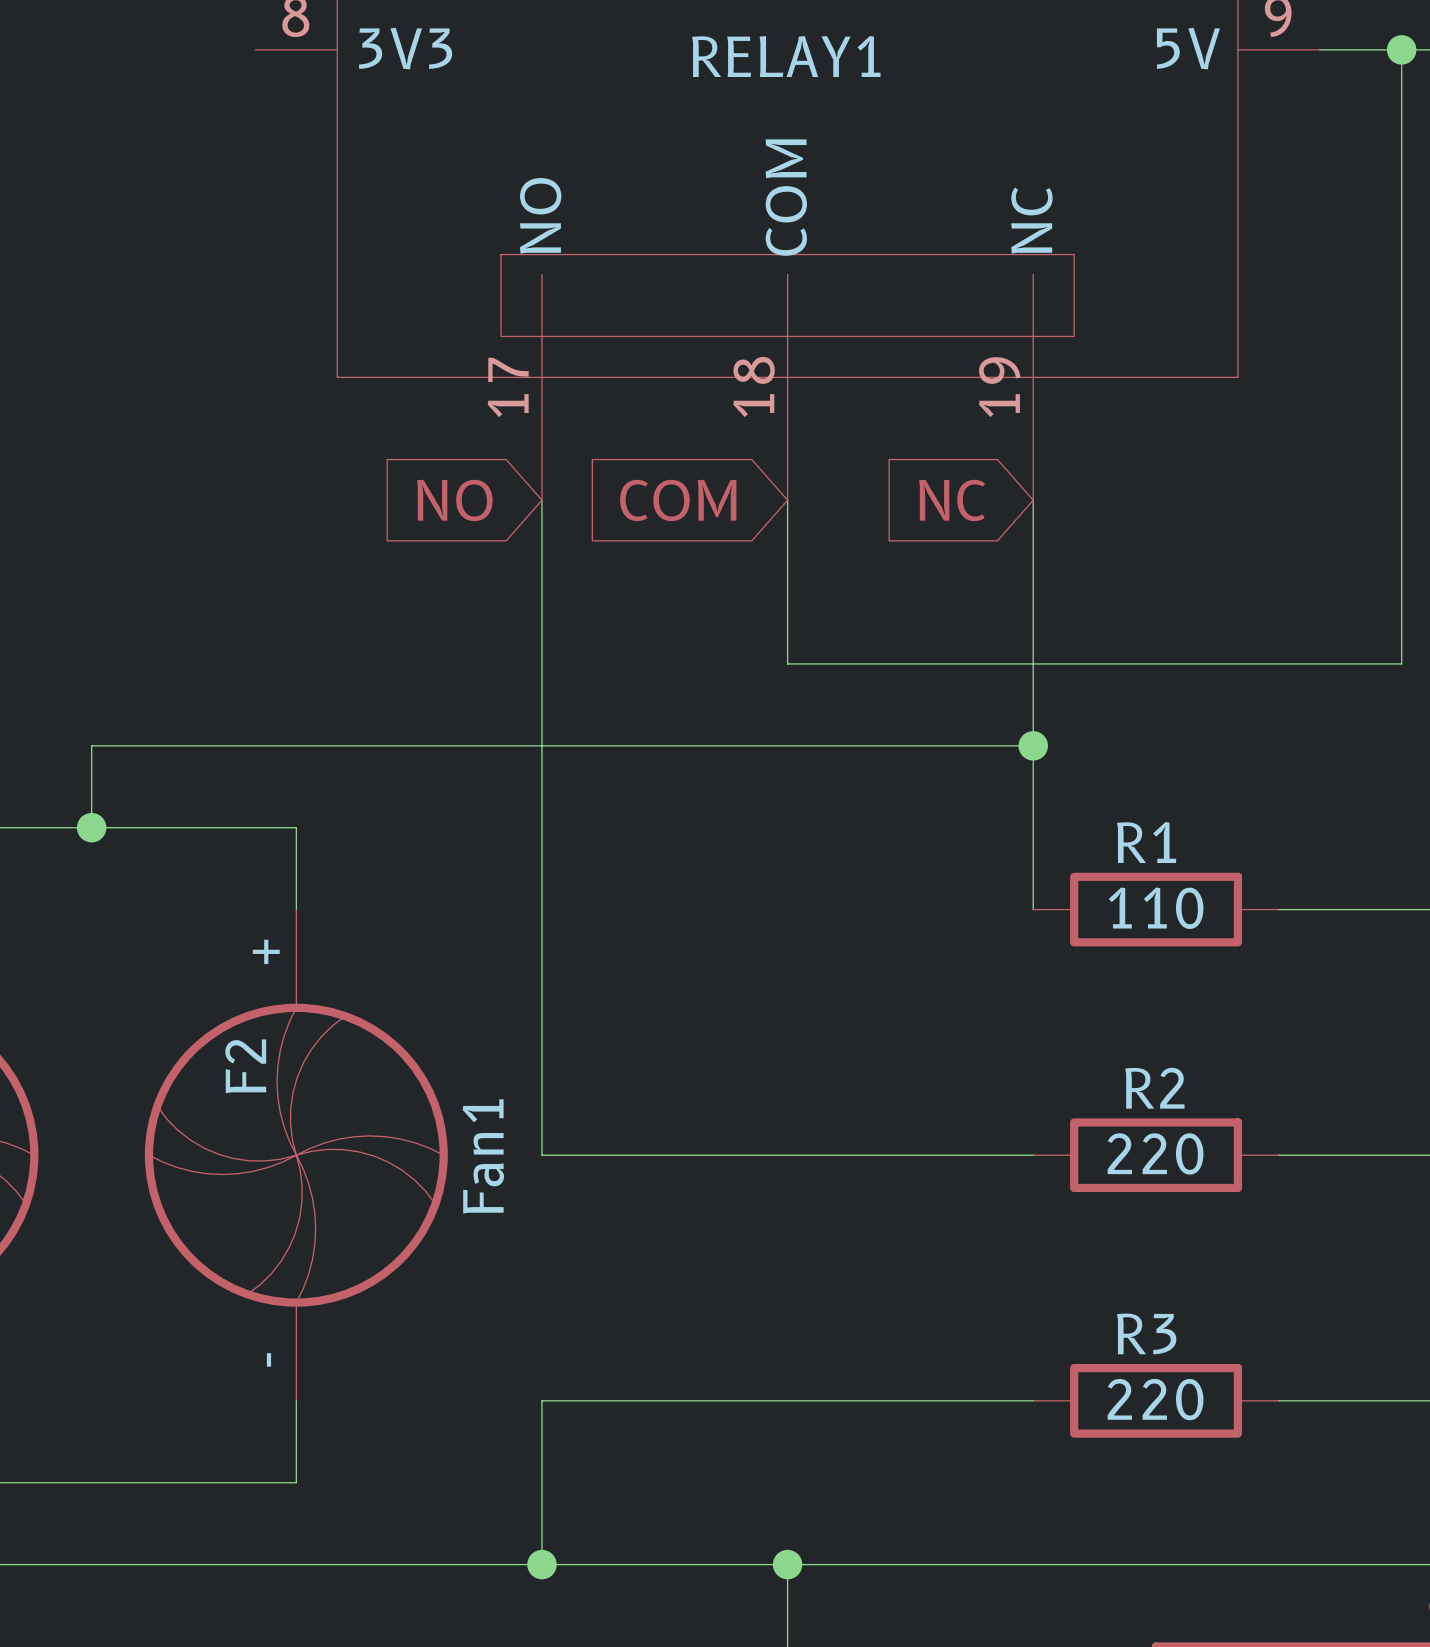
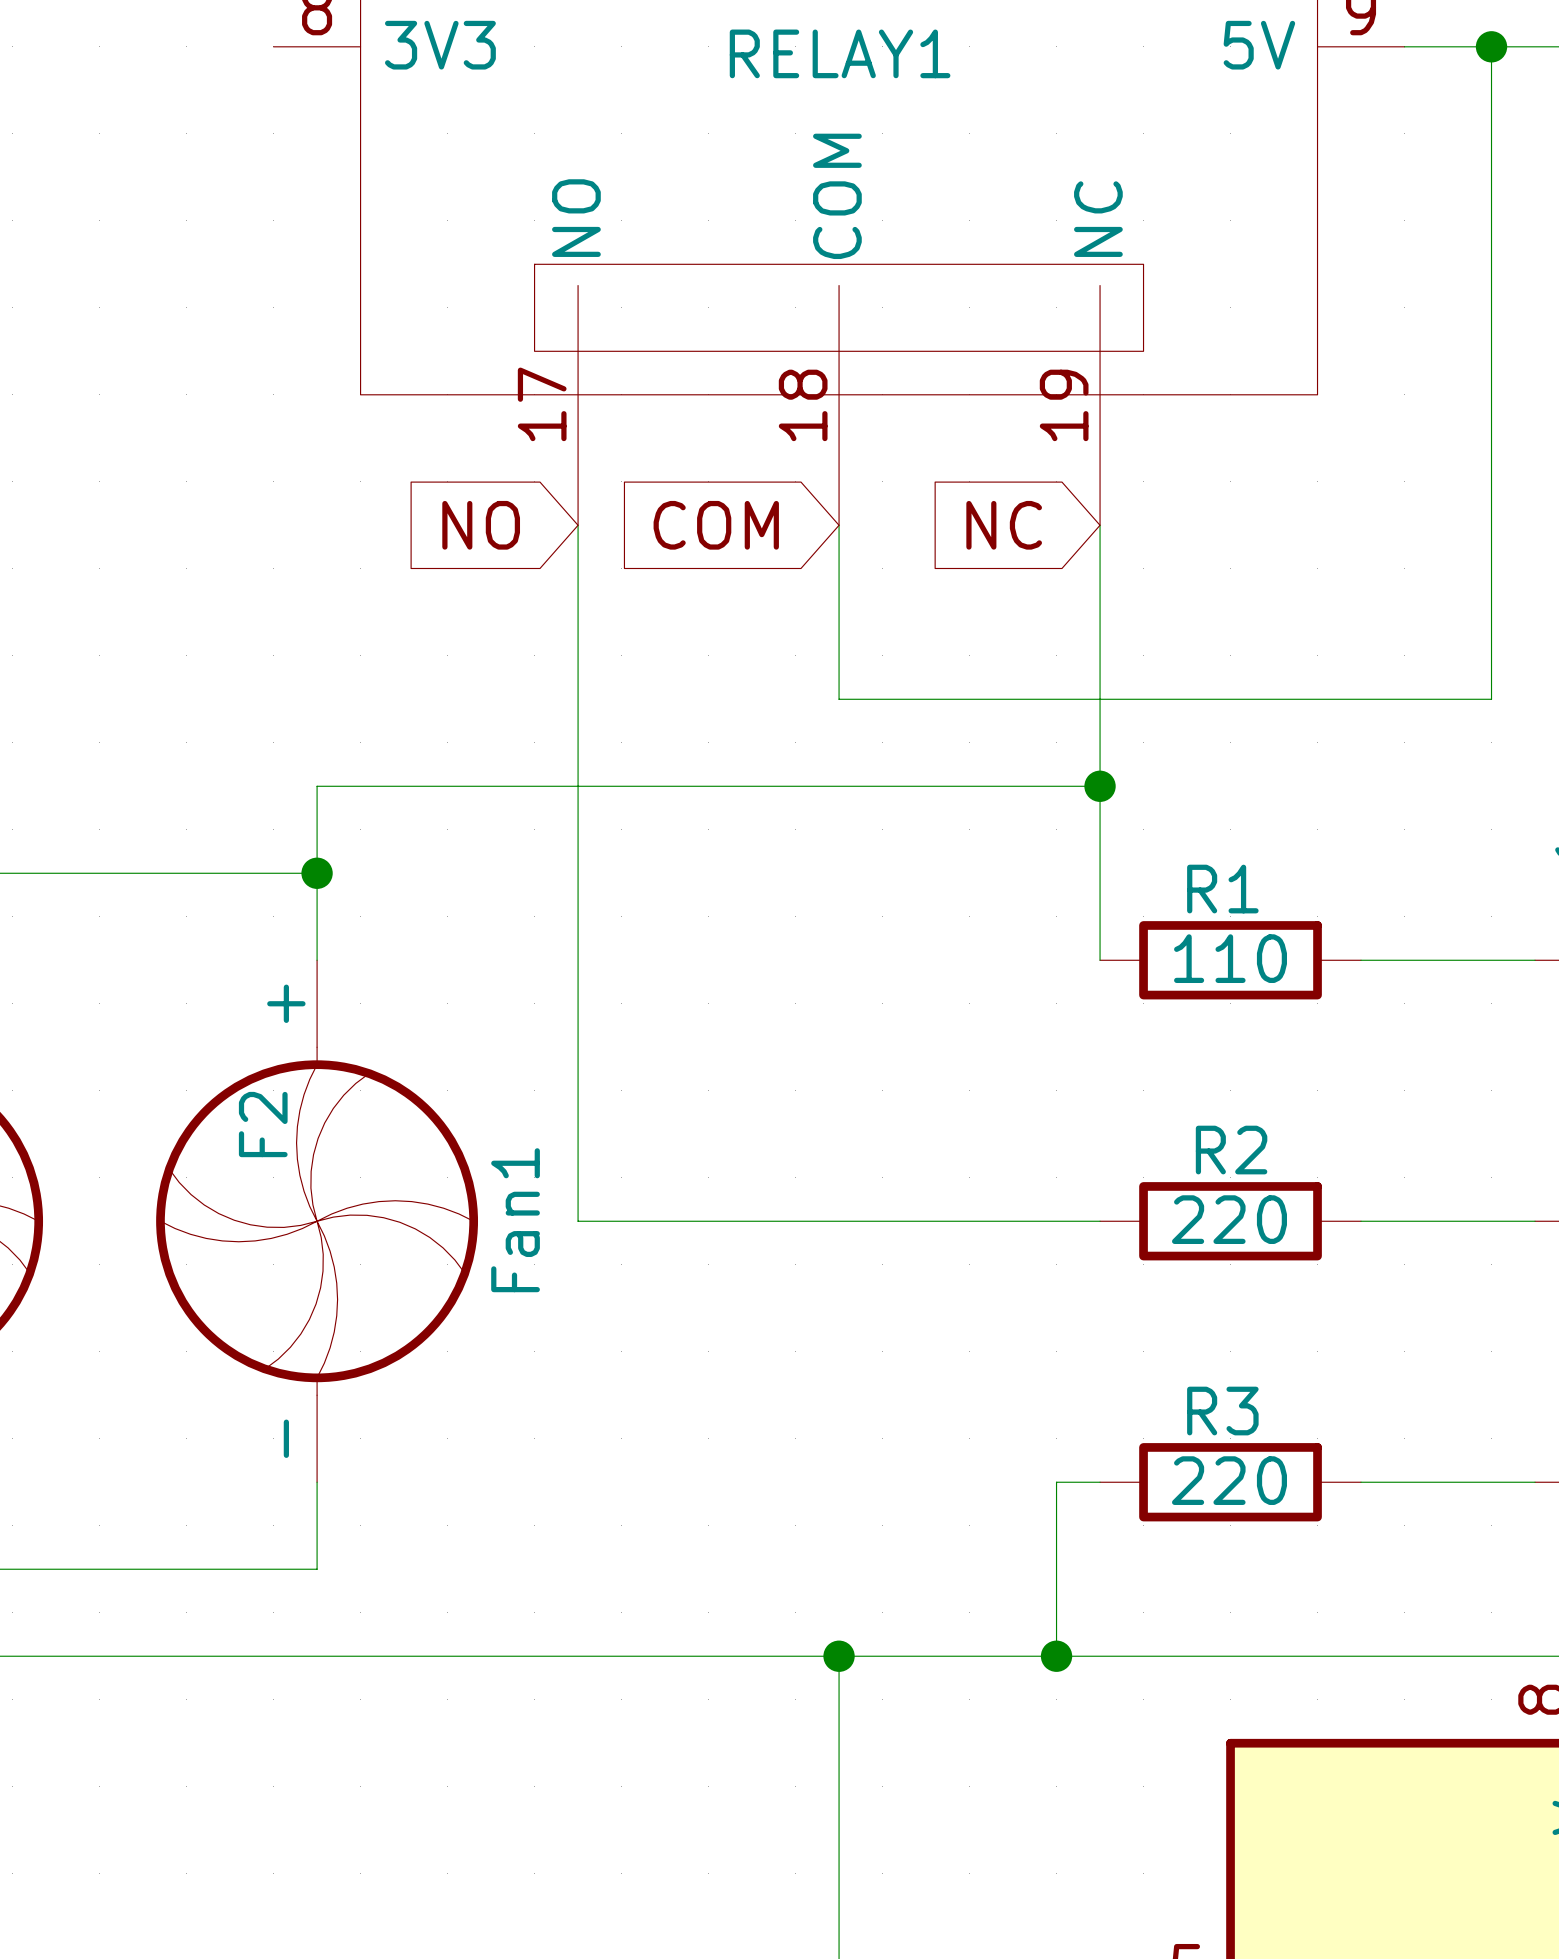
wire: (296, 745) (91, 745) (91, 827) -> (317, 786) (317, 873)
junction: (91, 827) -> none
junction: none -> (317, 873)
wire: (992, 1400) (541, 1400) (541, 1564) -> (1056, 1482) (1056, 1656)
junction: (541, 1564) -> none
junction: none -> (1056, 1656)

